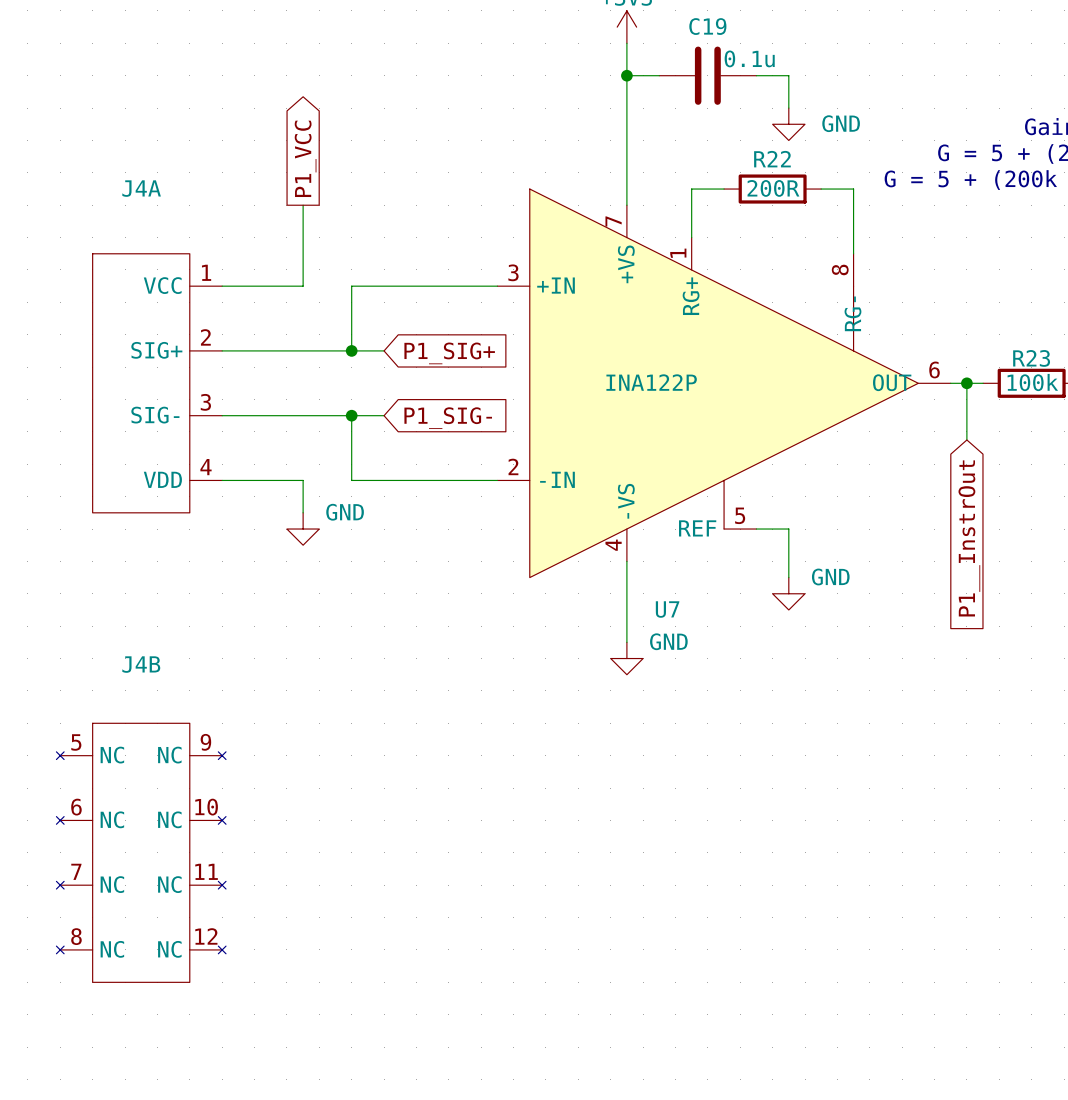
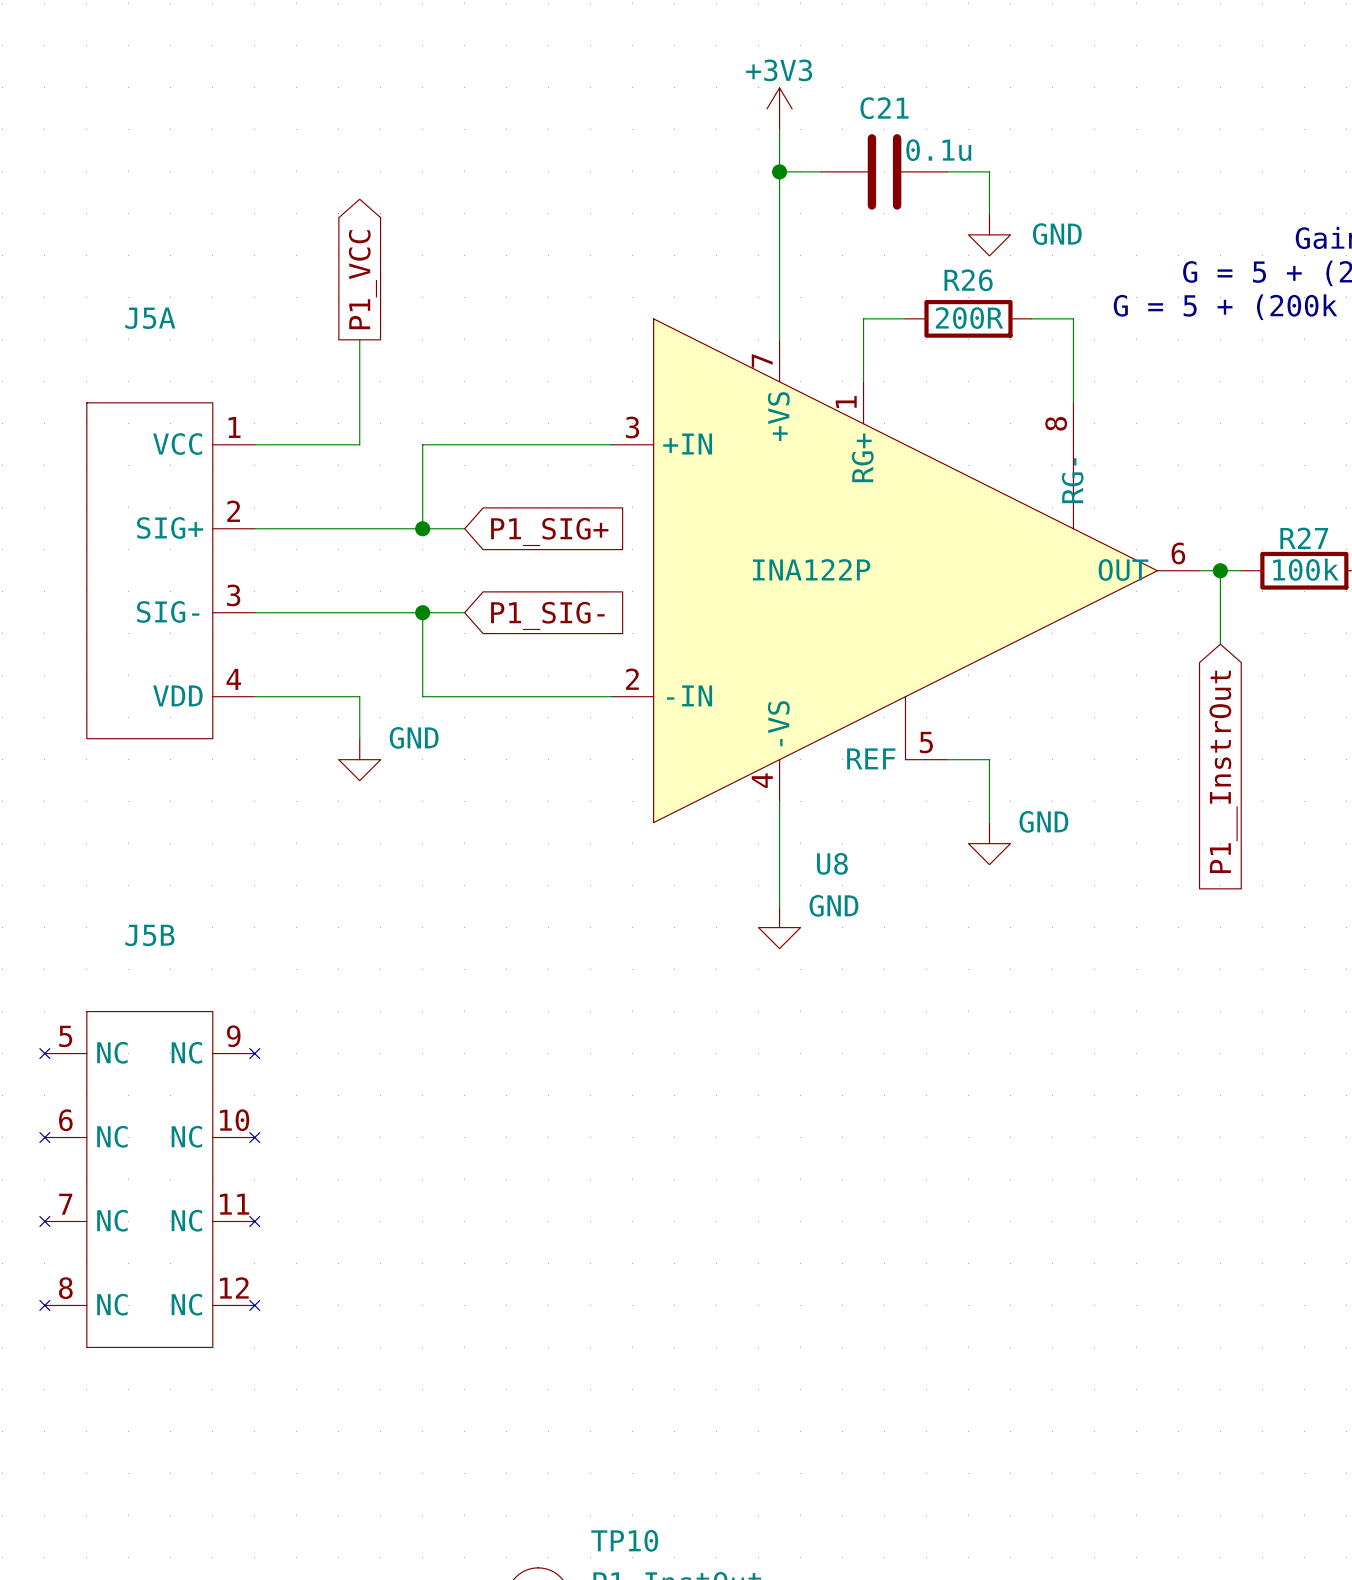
C19 name: C19 (707, 26) -> C21 (884, 108)
R22 name: R22 (772, 159) -> R26 (968, 280)
J4A name: J4A (141, 188) -> J5A (150, 318)
R23 name: R23 (1031, 358) -> R27 (1304, 538)
U7 name: U7 (667, 609) -> U8 (832, 863)
J4B name: J4B (141, 664) -> J5B (149, 935)

